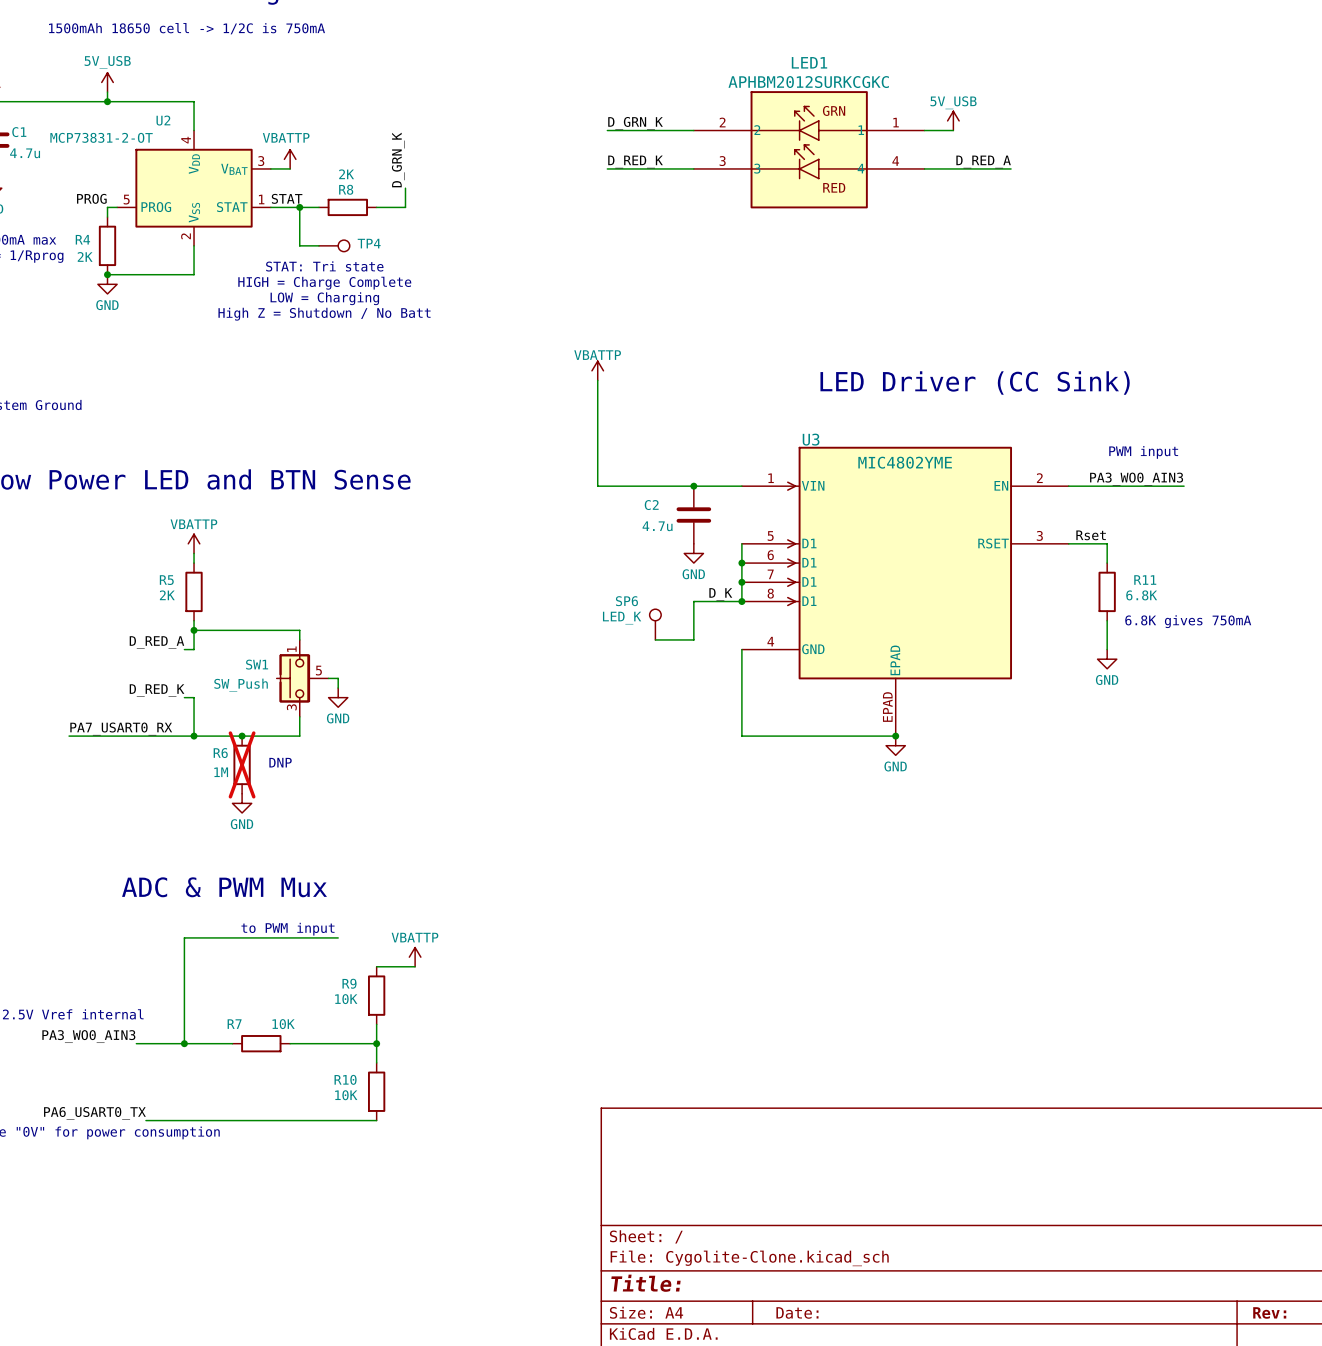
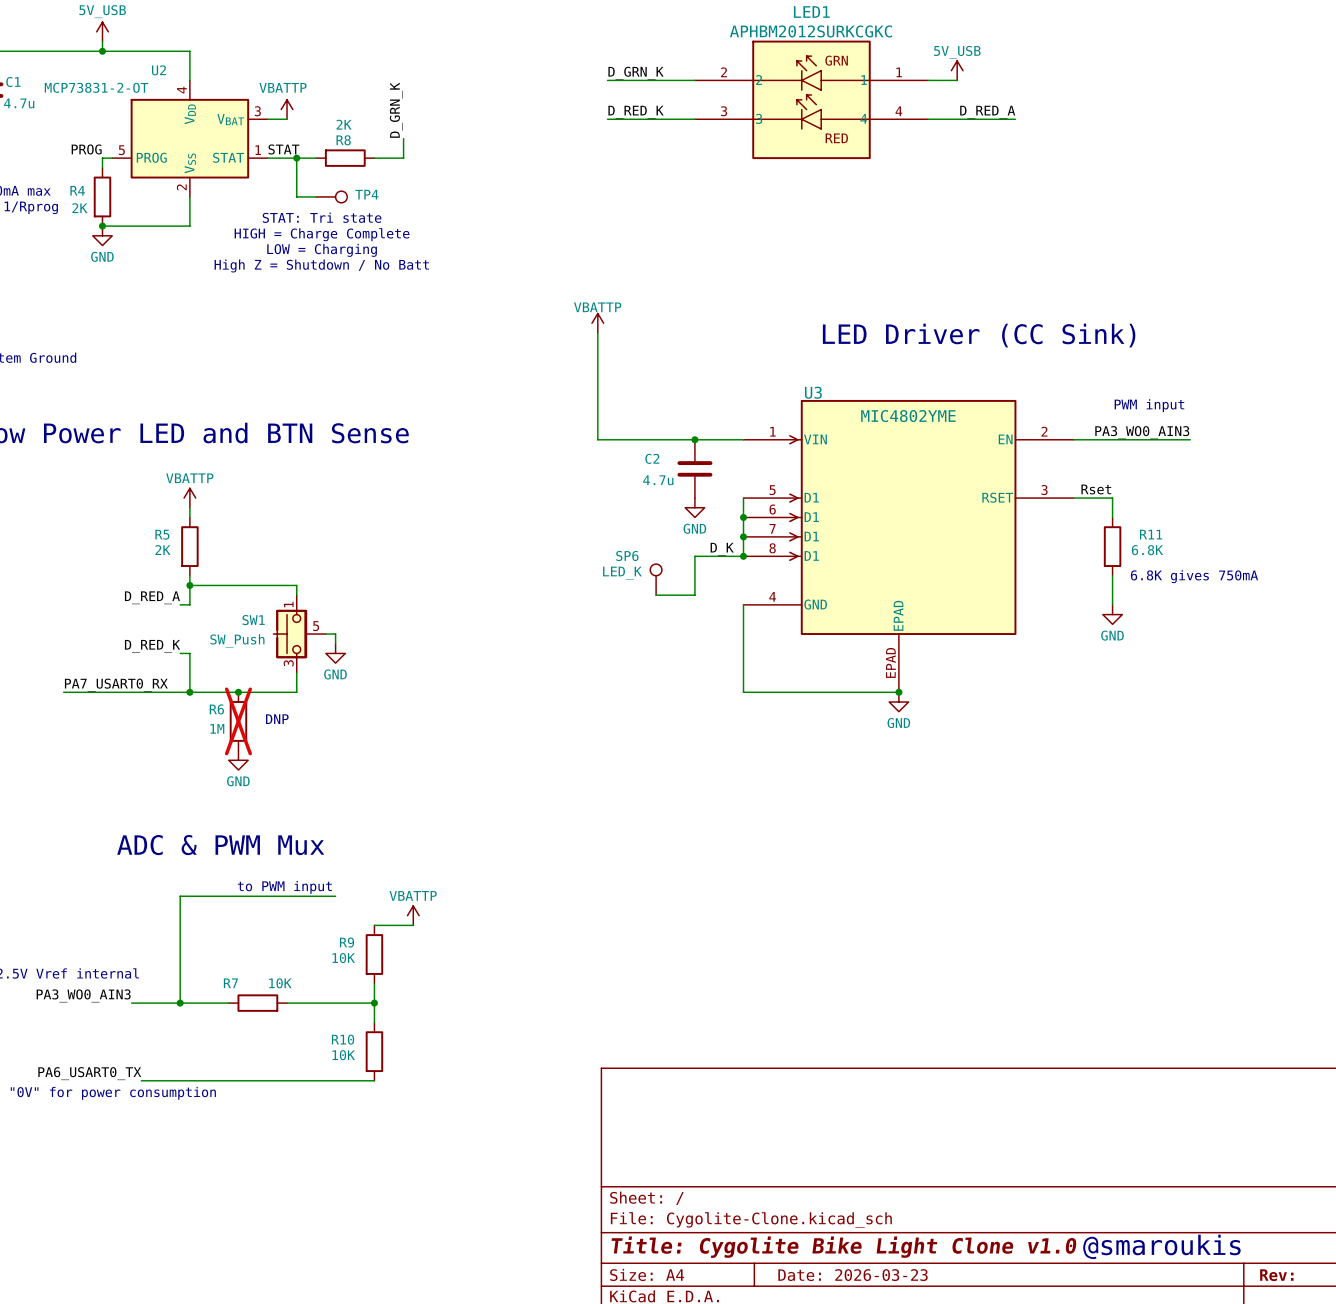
title block: Title: (645, 1283) -> Title: Cygolite Bike Light Clone v1.0 (844, 1247)
text: none -> @smaroukis (1161, 1246)
title block: Date: (797, 1312) -> Date: 2026-03-23 (853, 1275)

